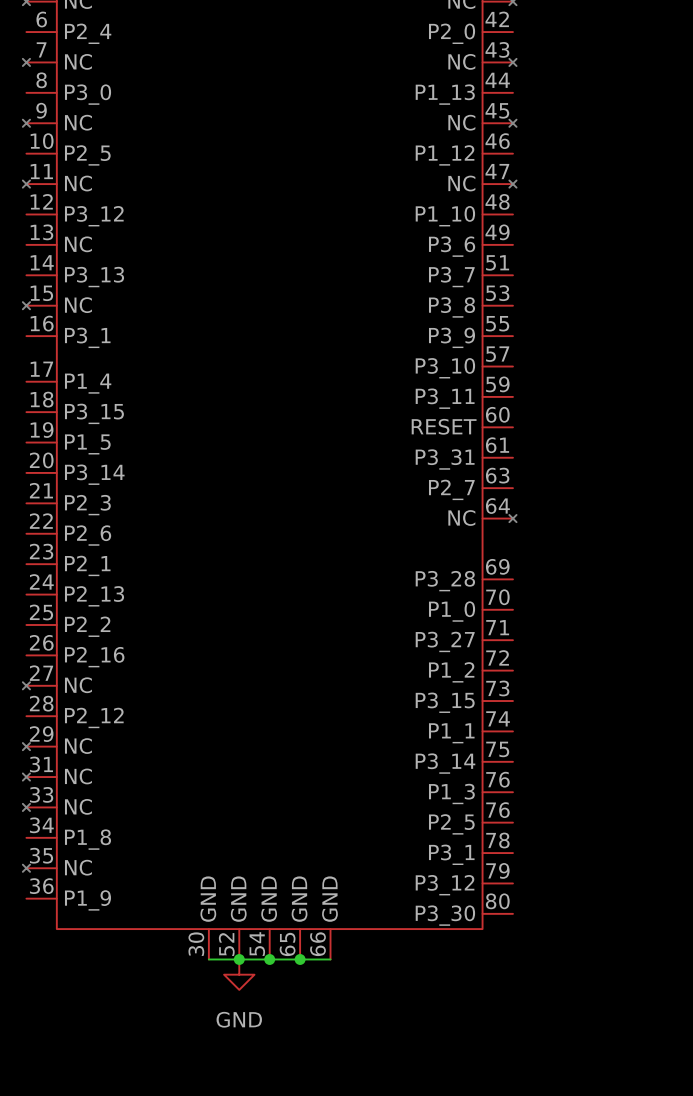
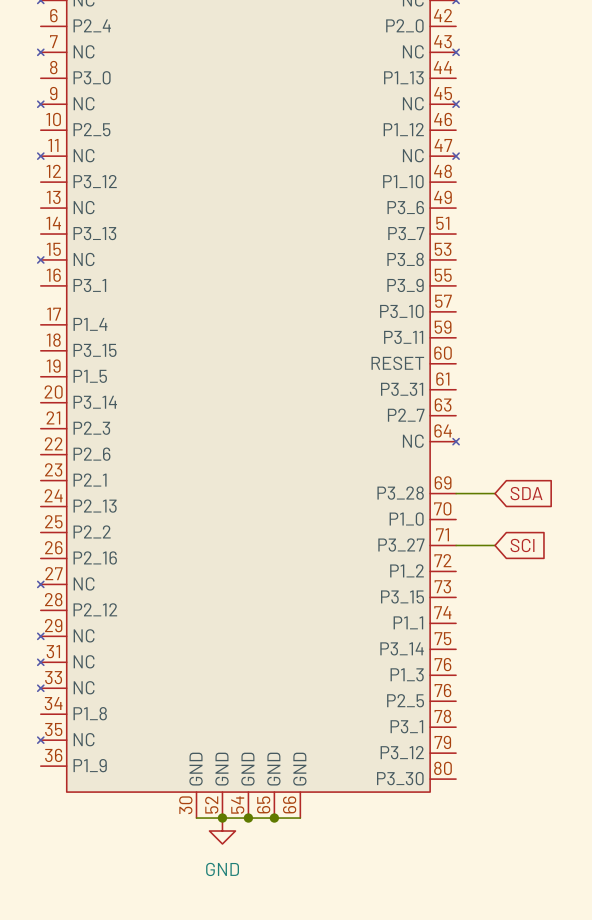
wire: none -> (456, 493) (495, 493)
global label: none -> SDA (526, 493)
wire: none -> (456, 545) (495, 545)
global label: none -> SCl (522, 545)

